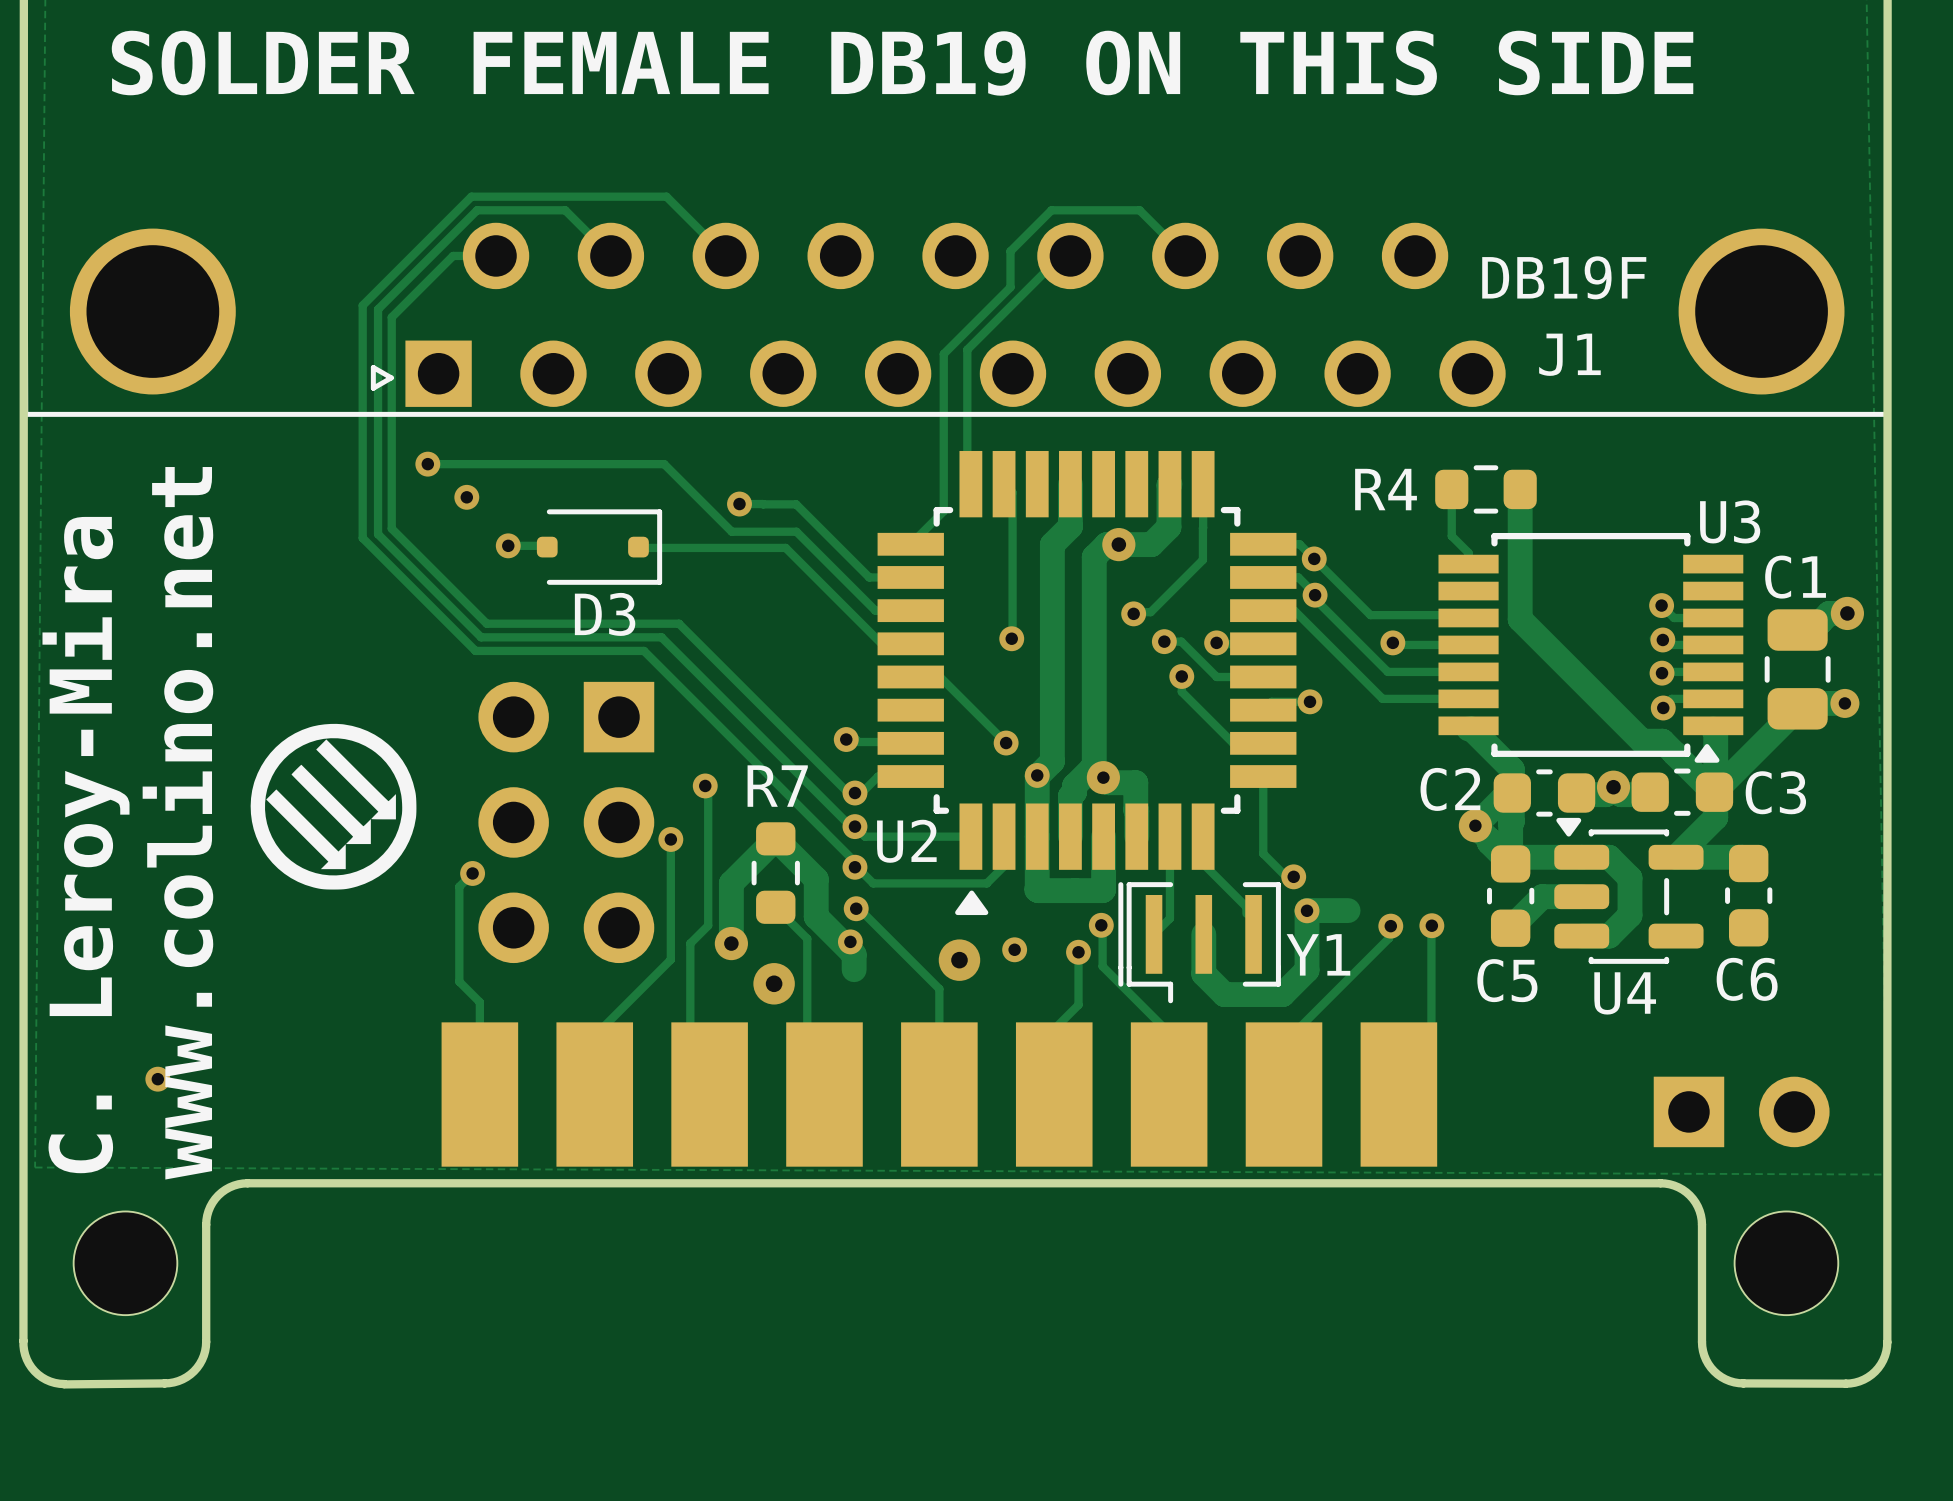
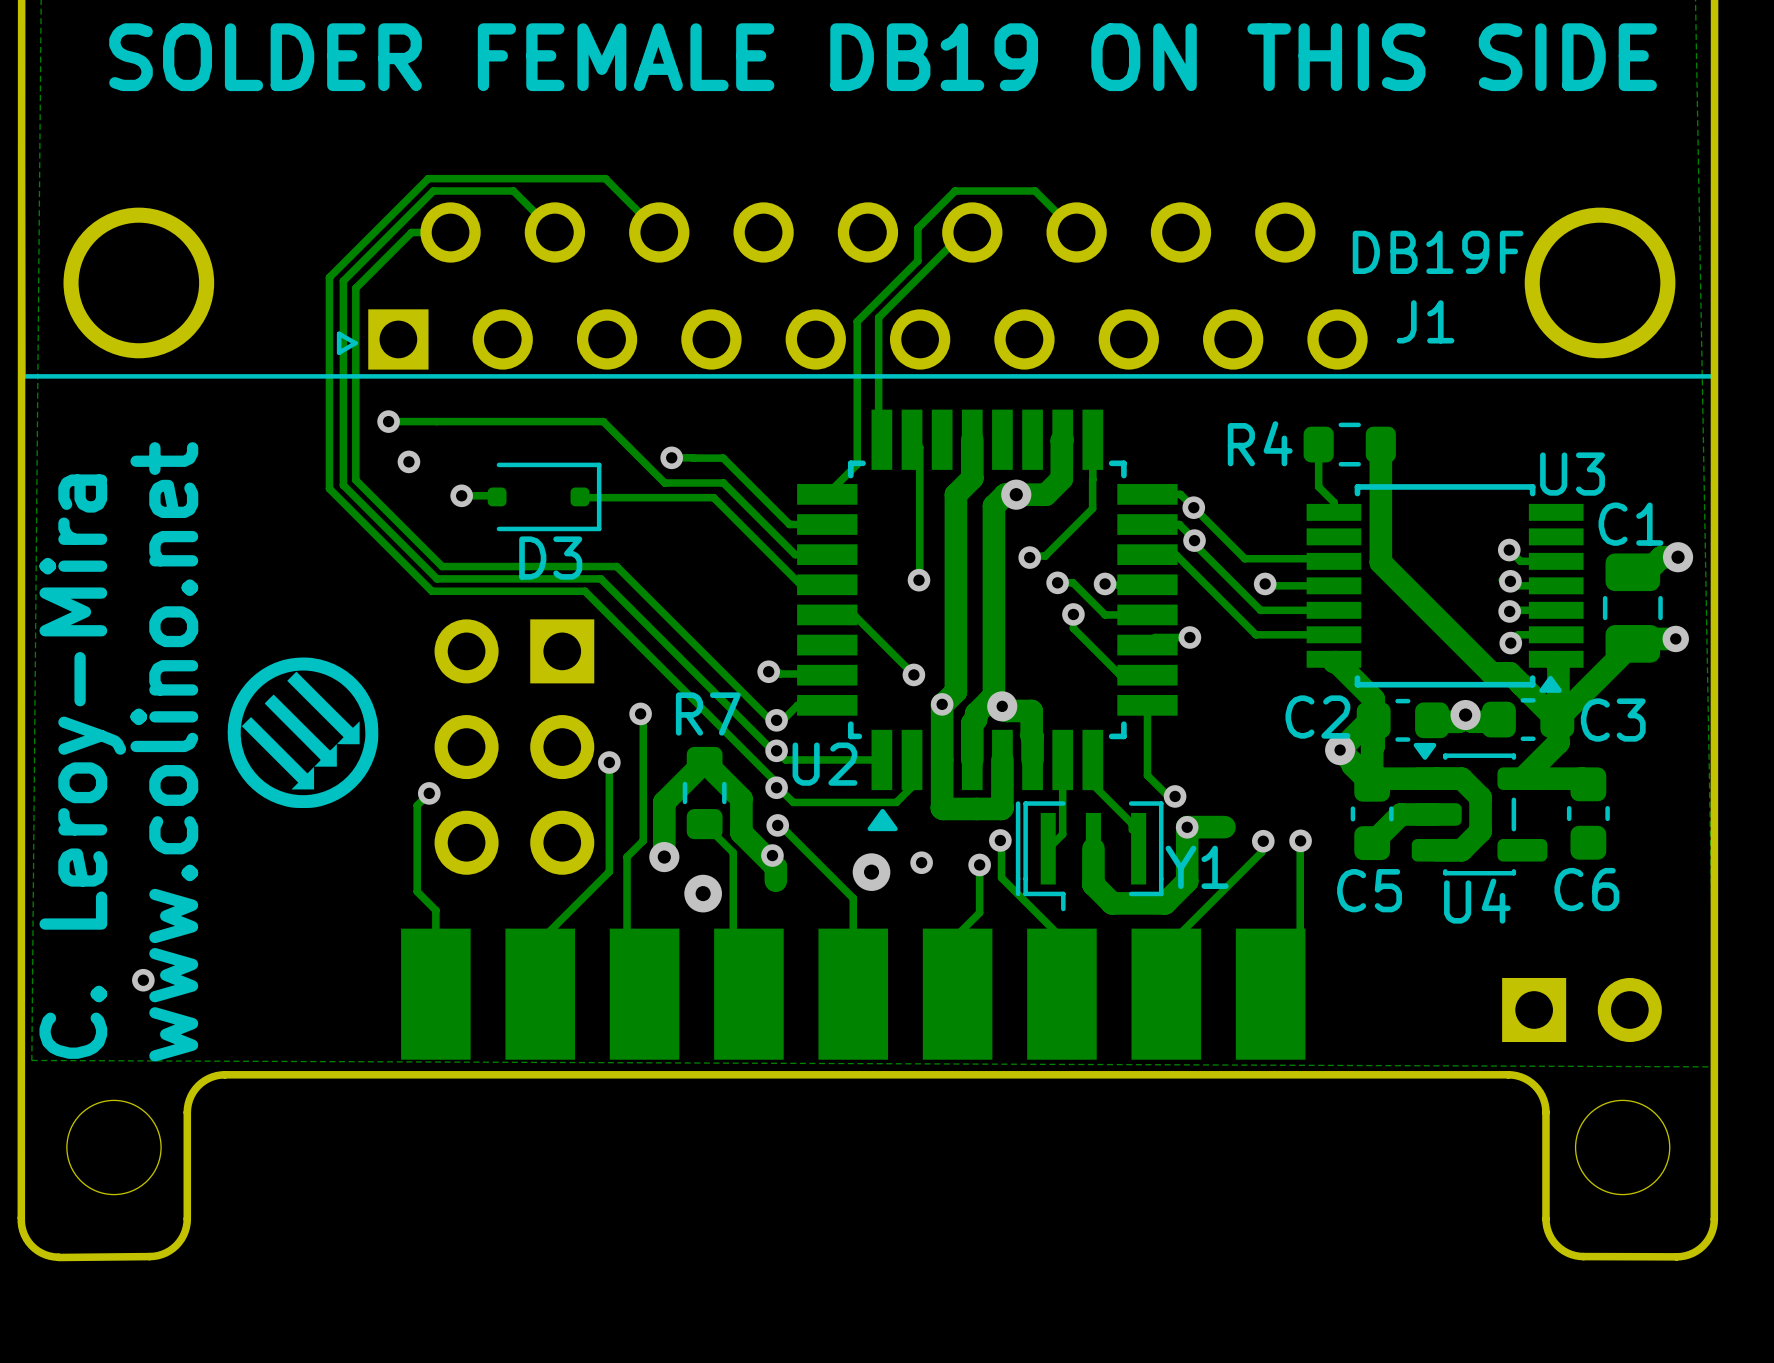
via position: (466, 497) -> (408, 461)

